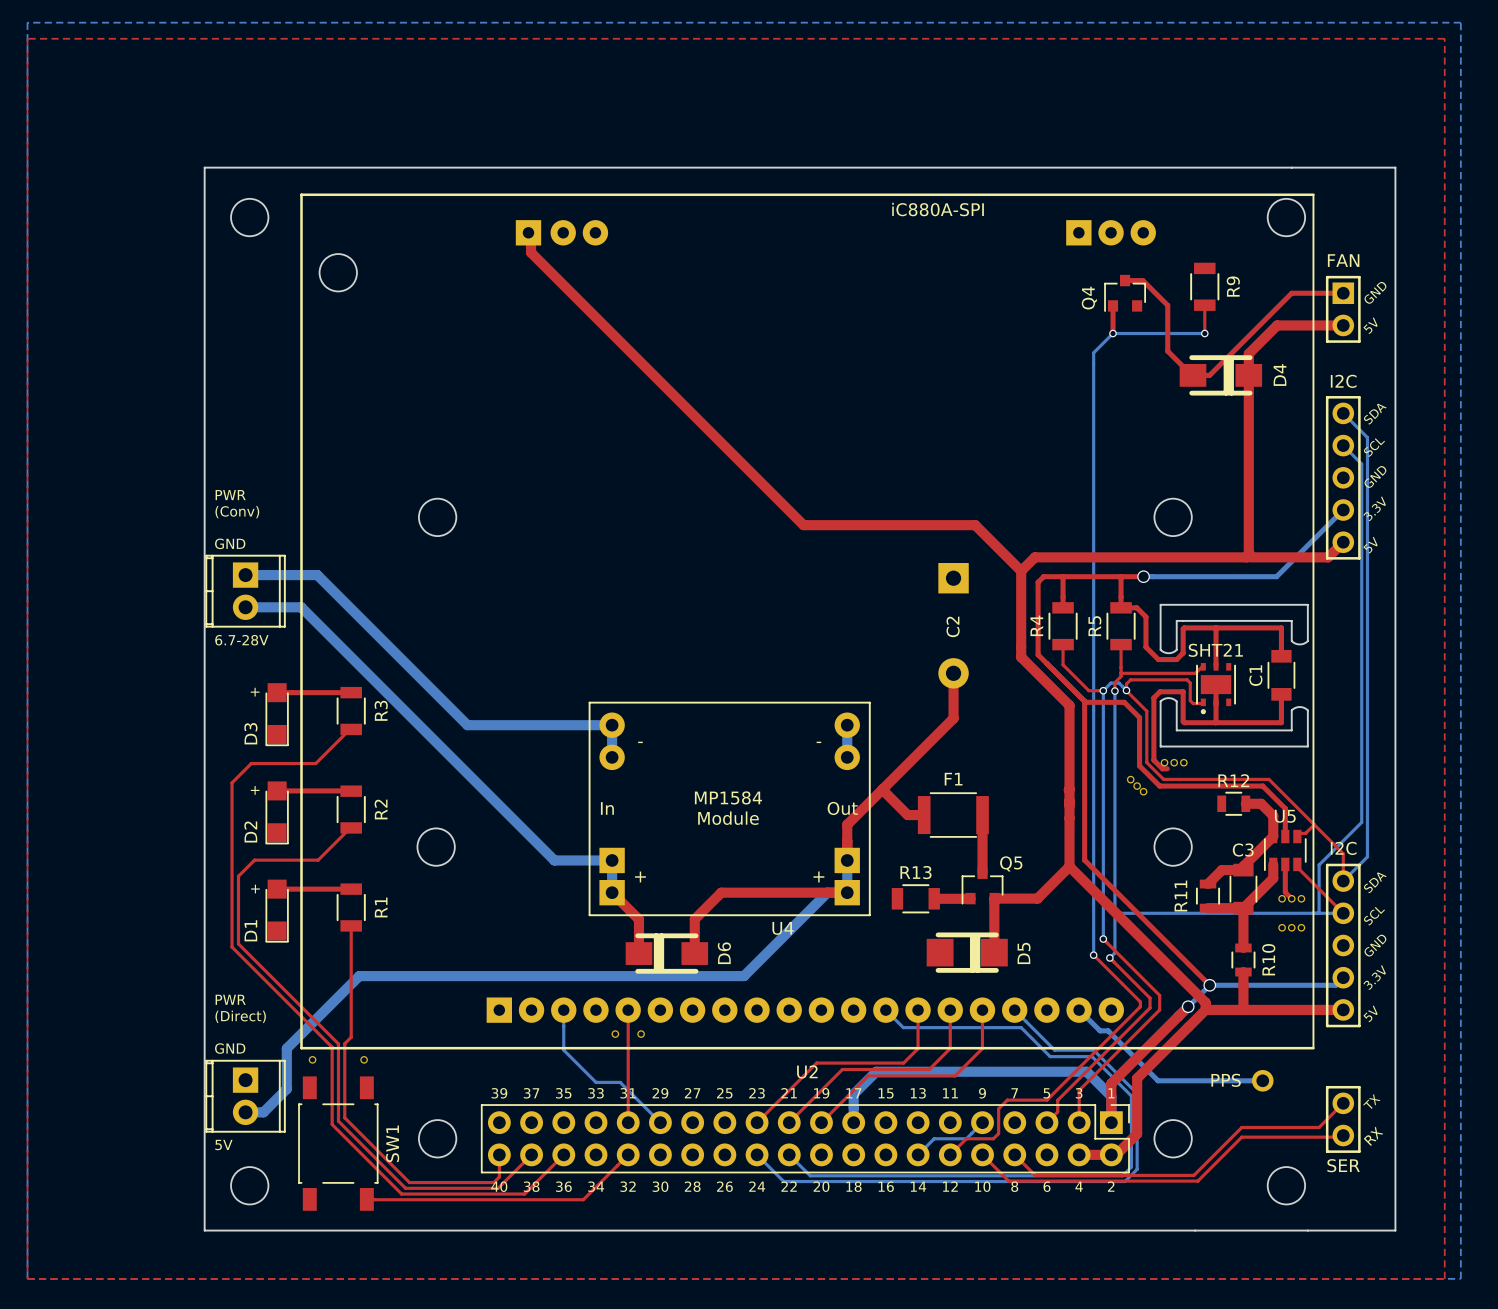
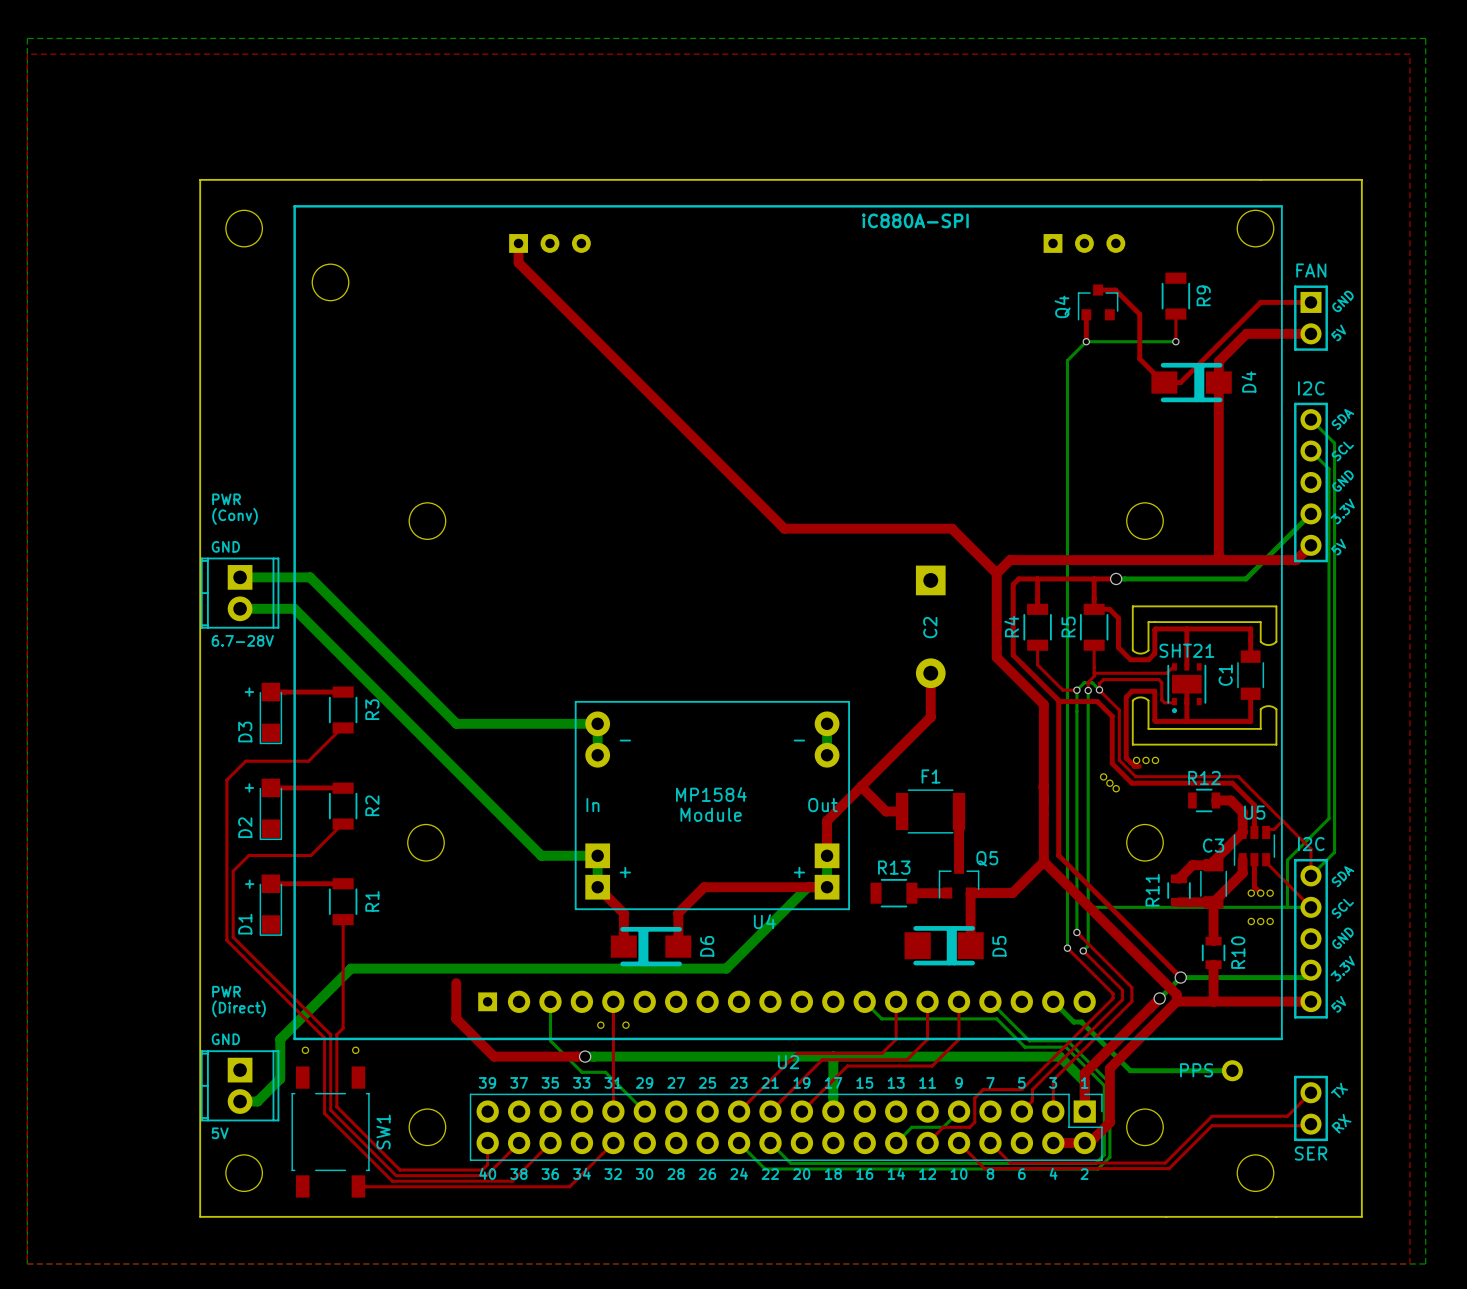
U2 footprint: [300, 193, 1315, 1050] -> [293, 205, 1284, 1041]
top track: none -> (456, 983) (456, 1018) (493, 1056) (585, 1056)
via: none -> (585, 1056)
bottom track: none -> (833, 1056) (833, 1083)
bottom track: (853, 1094) (876, 1071) (1086, 1071) (1111, 1096) -> (585, 1056) (1059, 1056) (1084, 1081) (1084, 1085)

